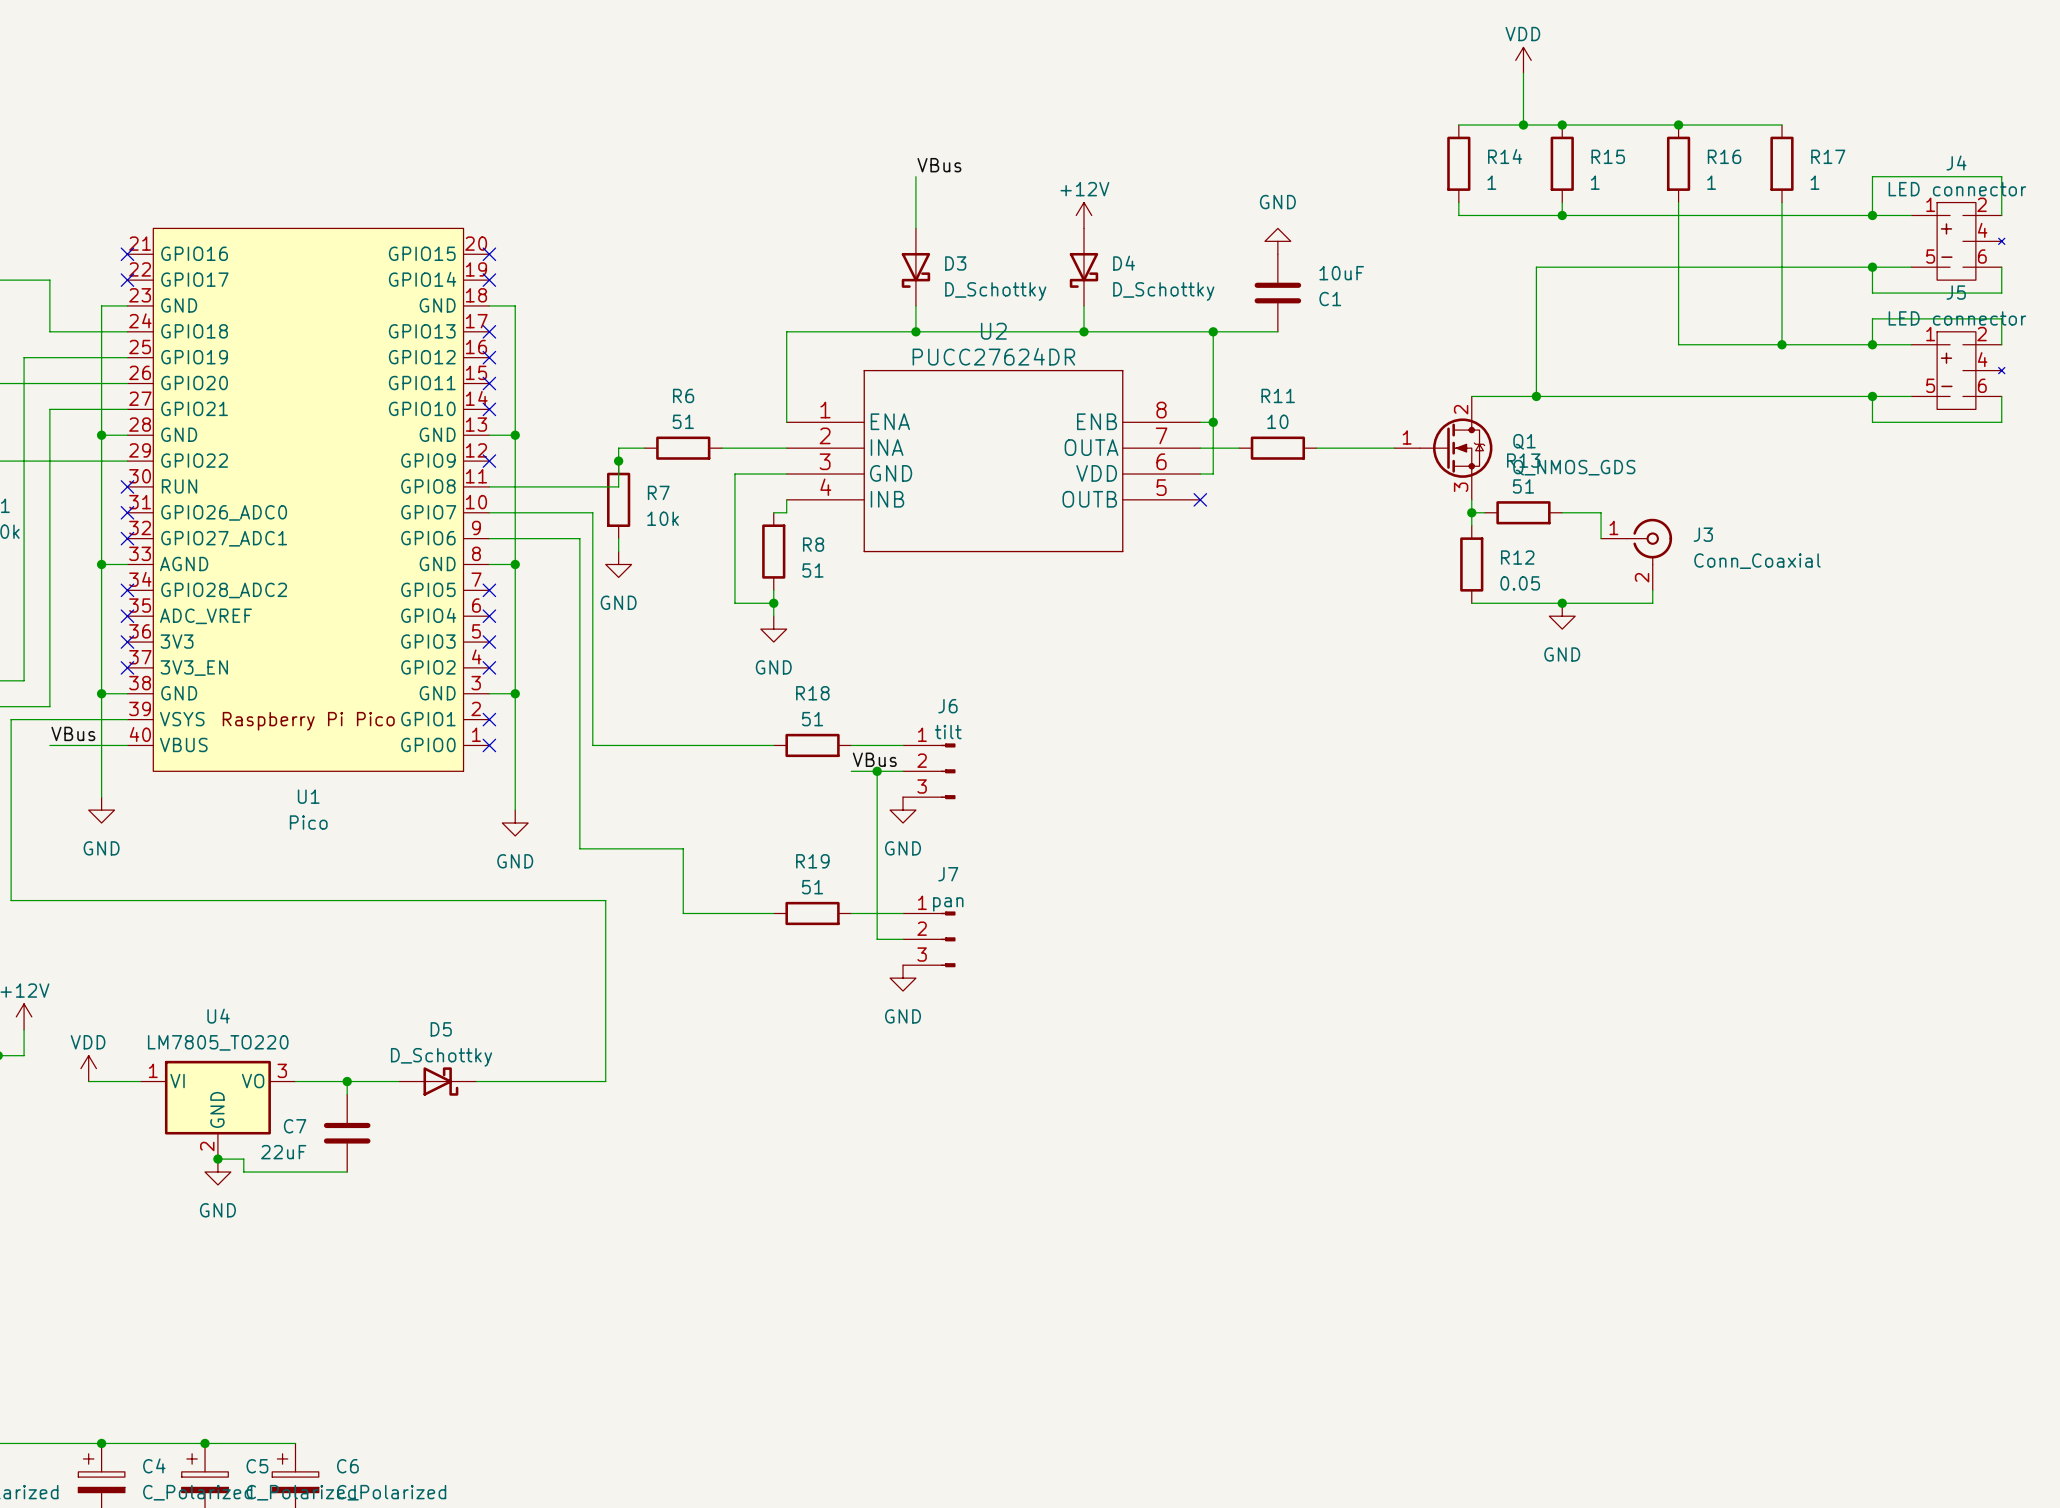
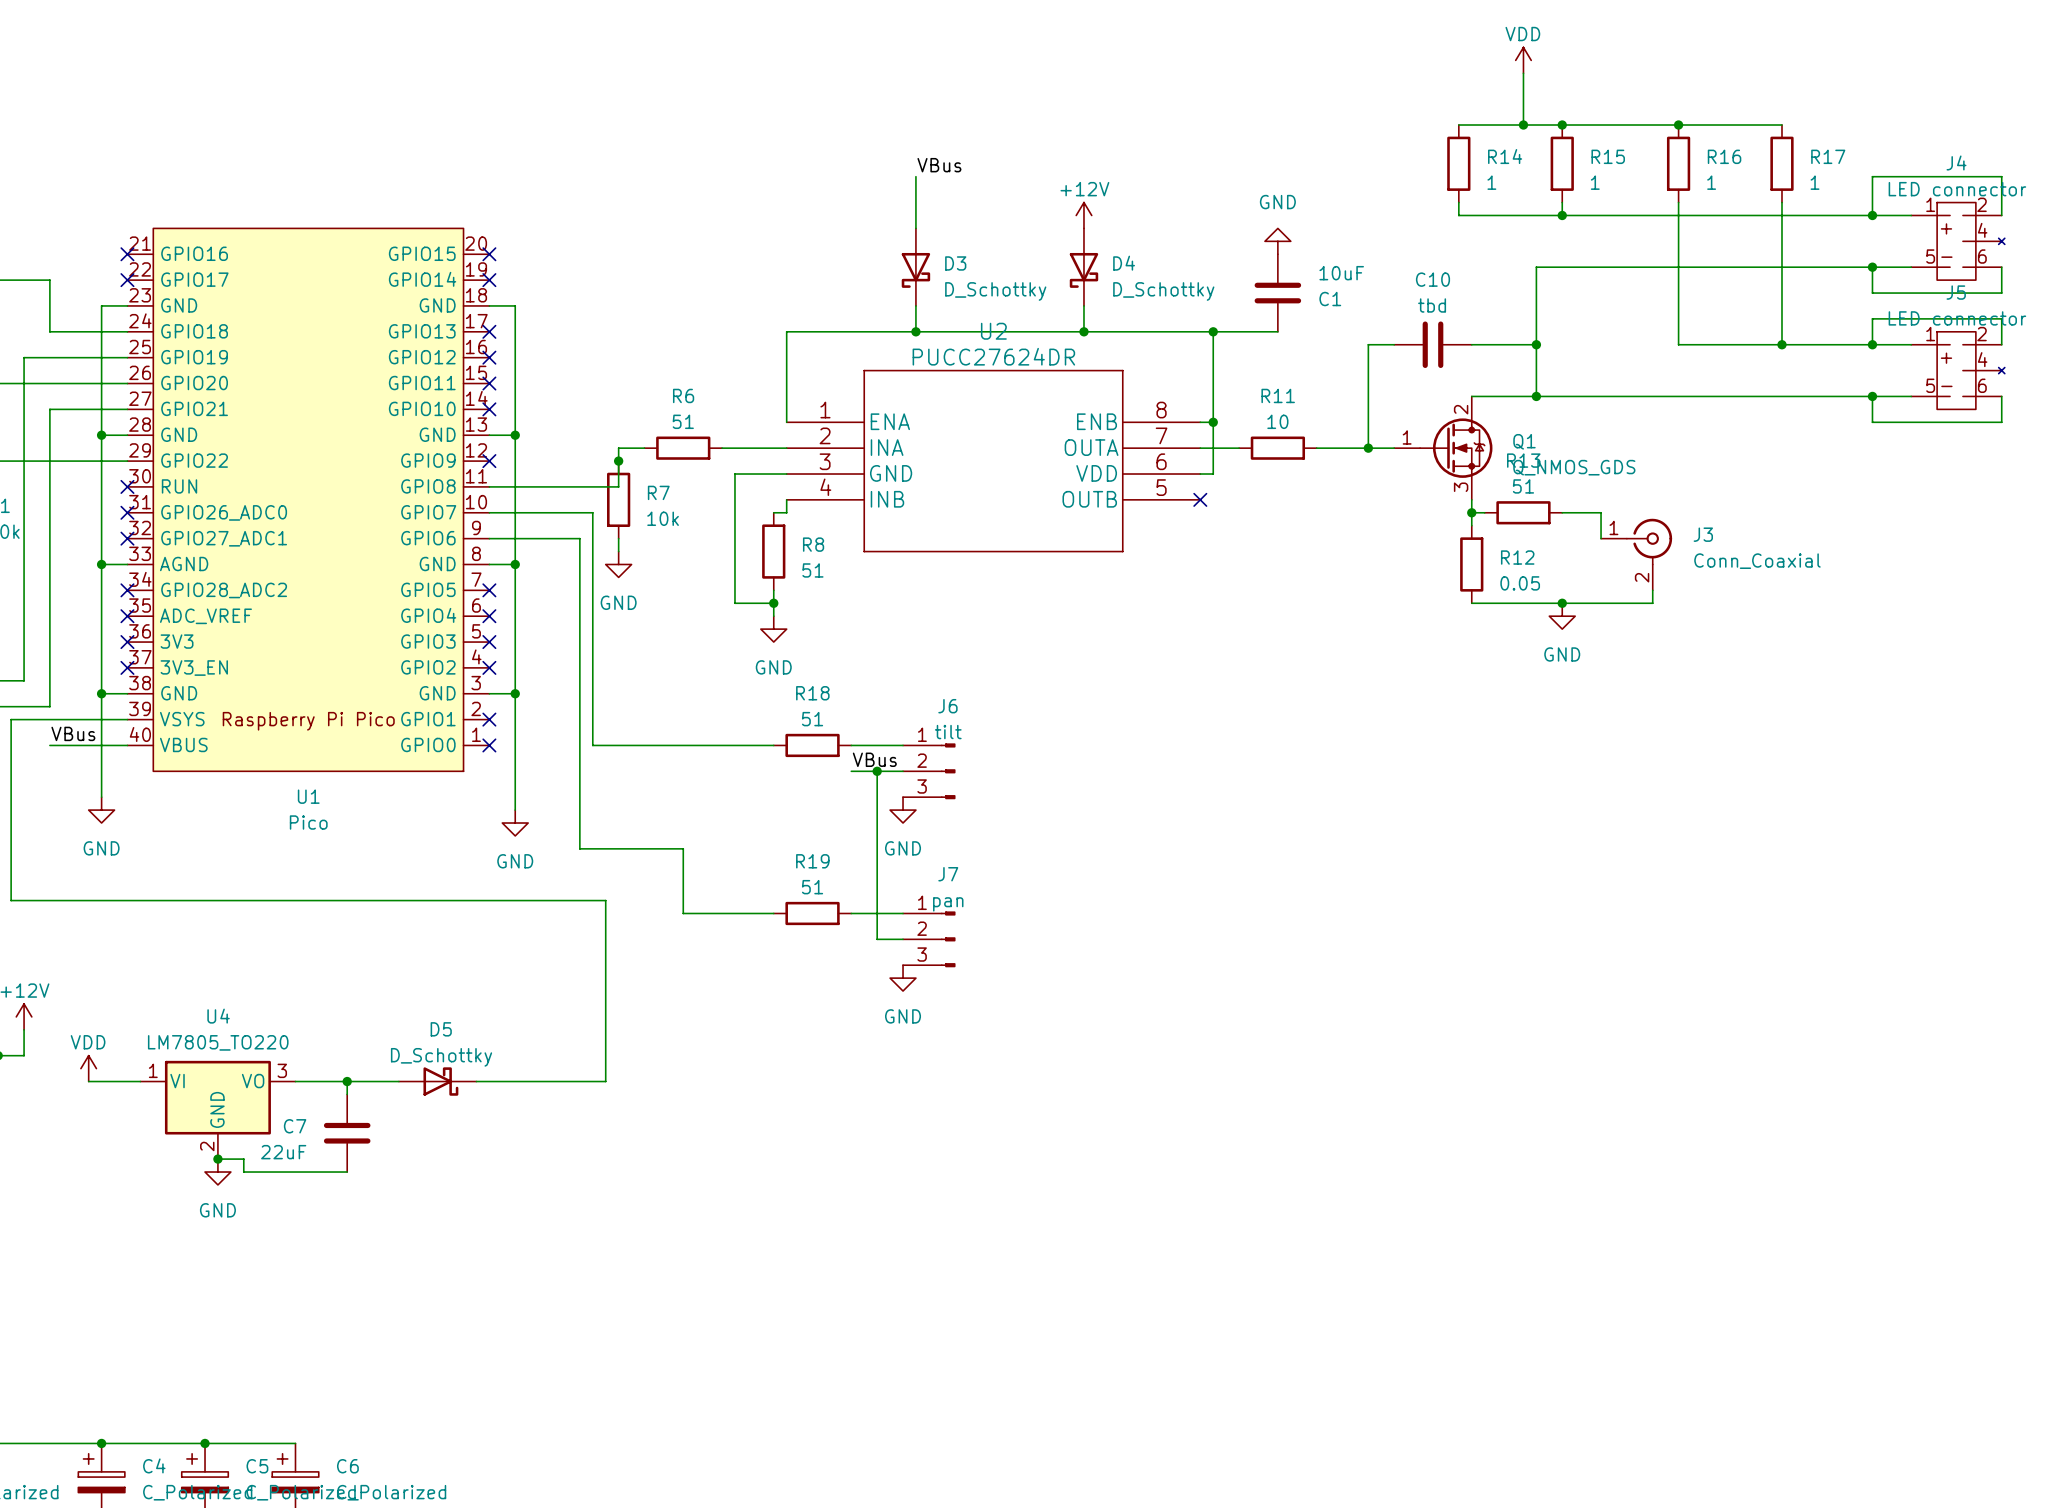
wire: none -> (1394, 344) (1368, 344) (1368, 448)
C10: none -> tbd (1432, 344)
wire: none -> (1471, 344) (1536, 344)
junction: none -> (1536, 344)
junction: none -> (1368, 448)

